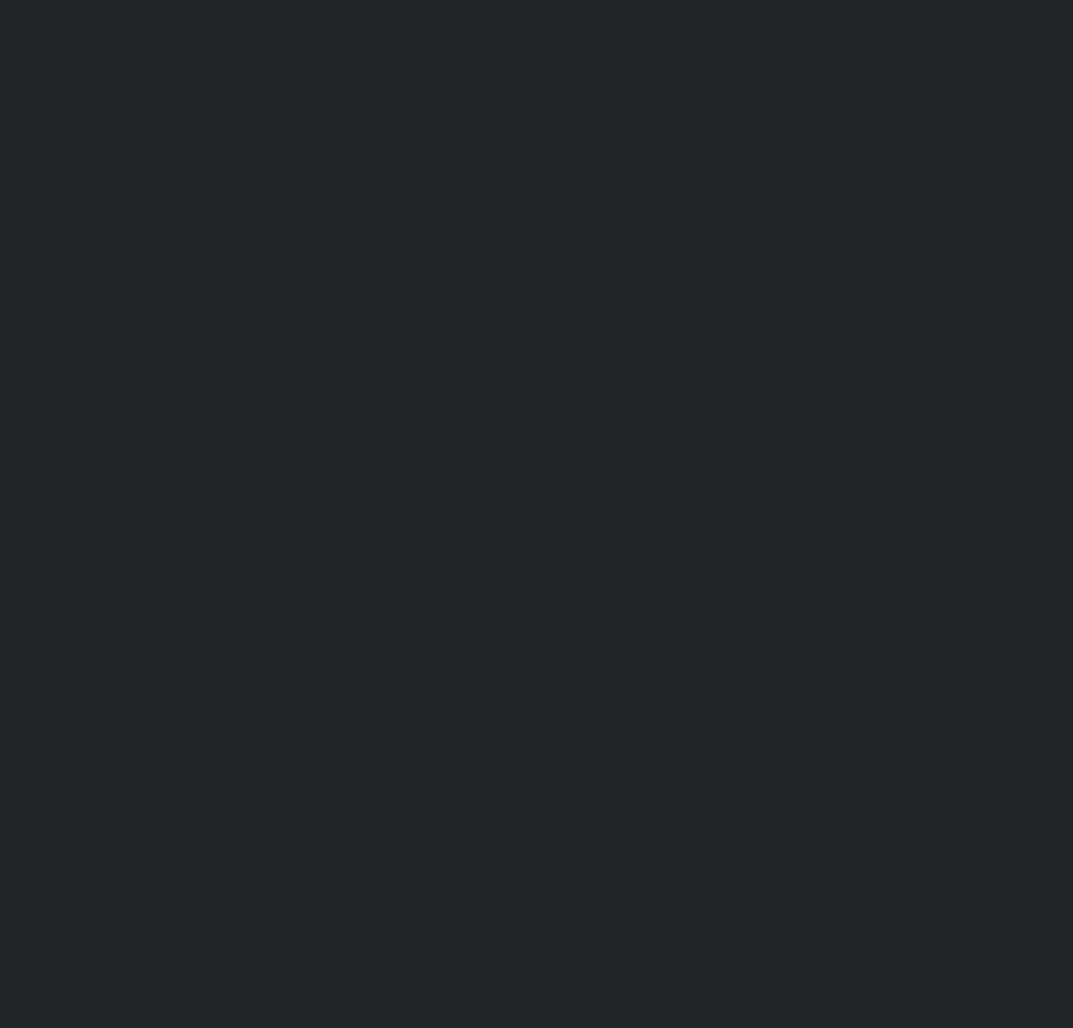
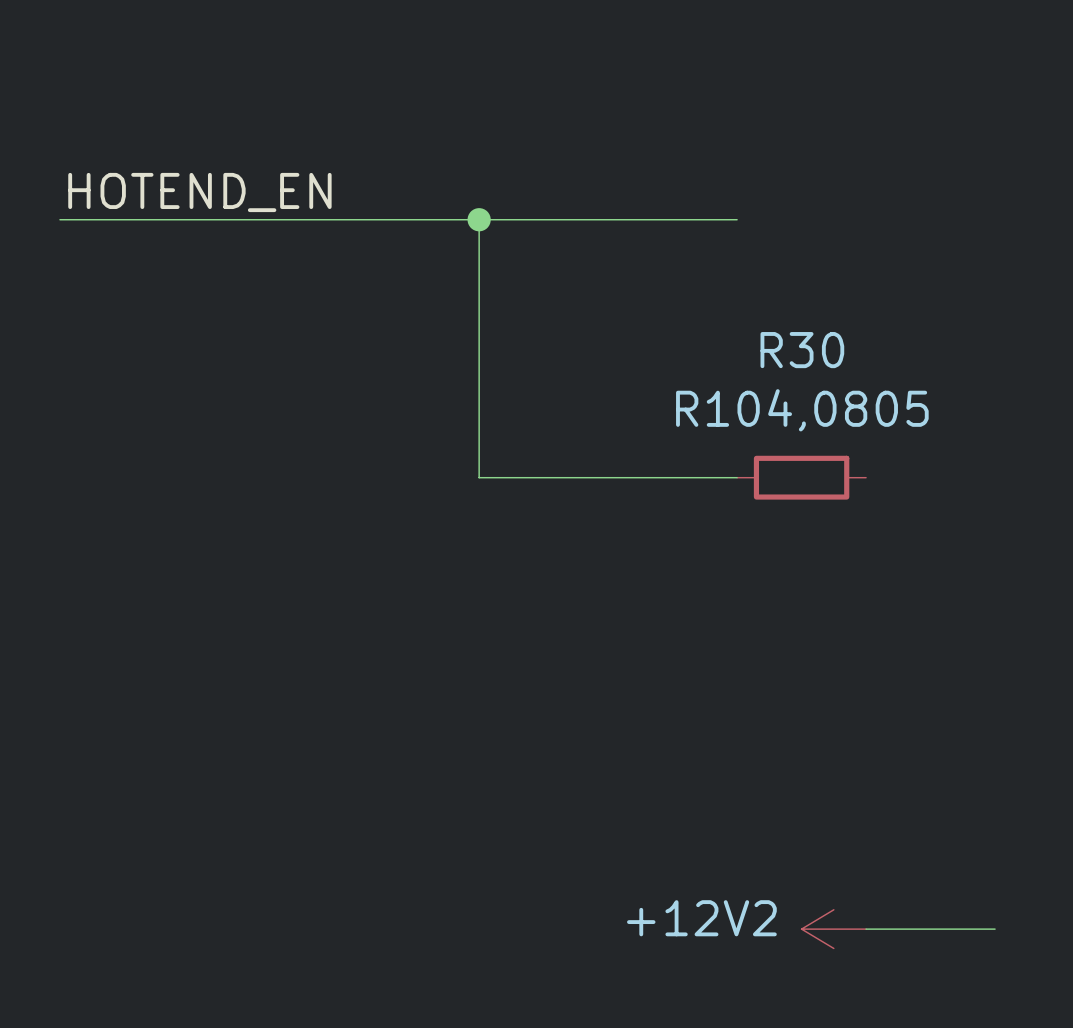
label: none -> HOTEND_EN (199, 192)
wire: none -> (59, 219) (737, 219)
wire: none -> (479, 219) (479, 477) (737, 477)
junction: none -> (479, 219)
R30: none -> R104,0805 (801, 477)
power symbol: none -> +12V2 (833, 929)
wire: none -> (866, 929) (995, 929)

